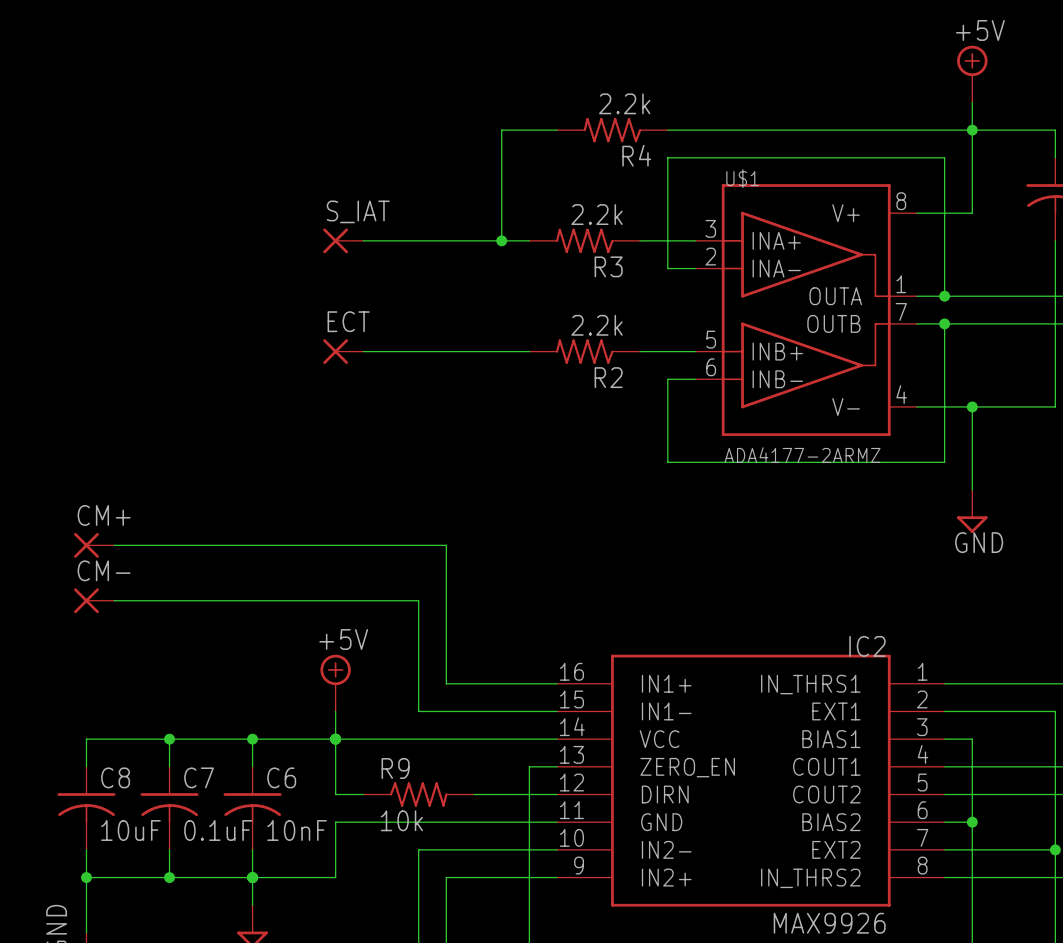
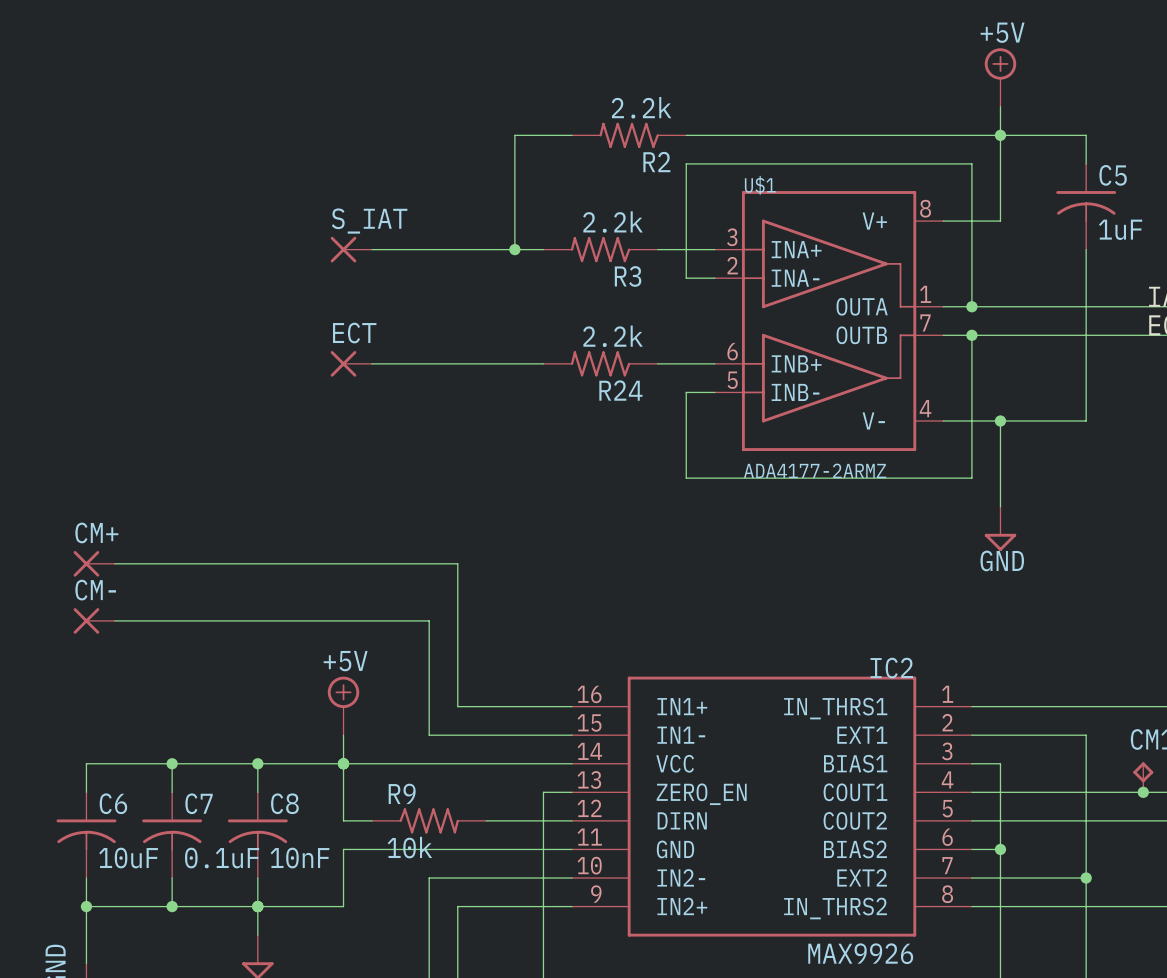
R4 name: R4 (636, 155) -> R2 (656, 162)
U$1 pin number: 5 (711, 339) -> 6 (732, 351)
U$1 pin number: 6 (711, 367) -> 5 (732, 380)
R2 name: R2 (608, 377) -> R24 (620, 390)
C8 name: C8 (115, 777) -> C6 (113, 803)
C6 name: C6 (281, 777) -> C8 (284, 803)

